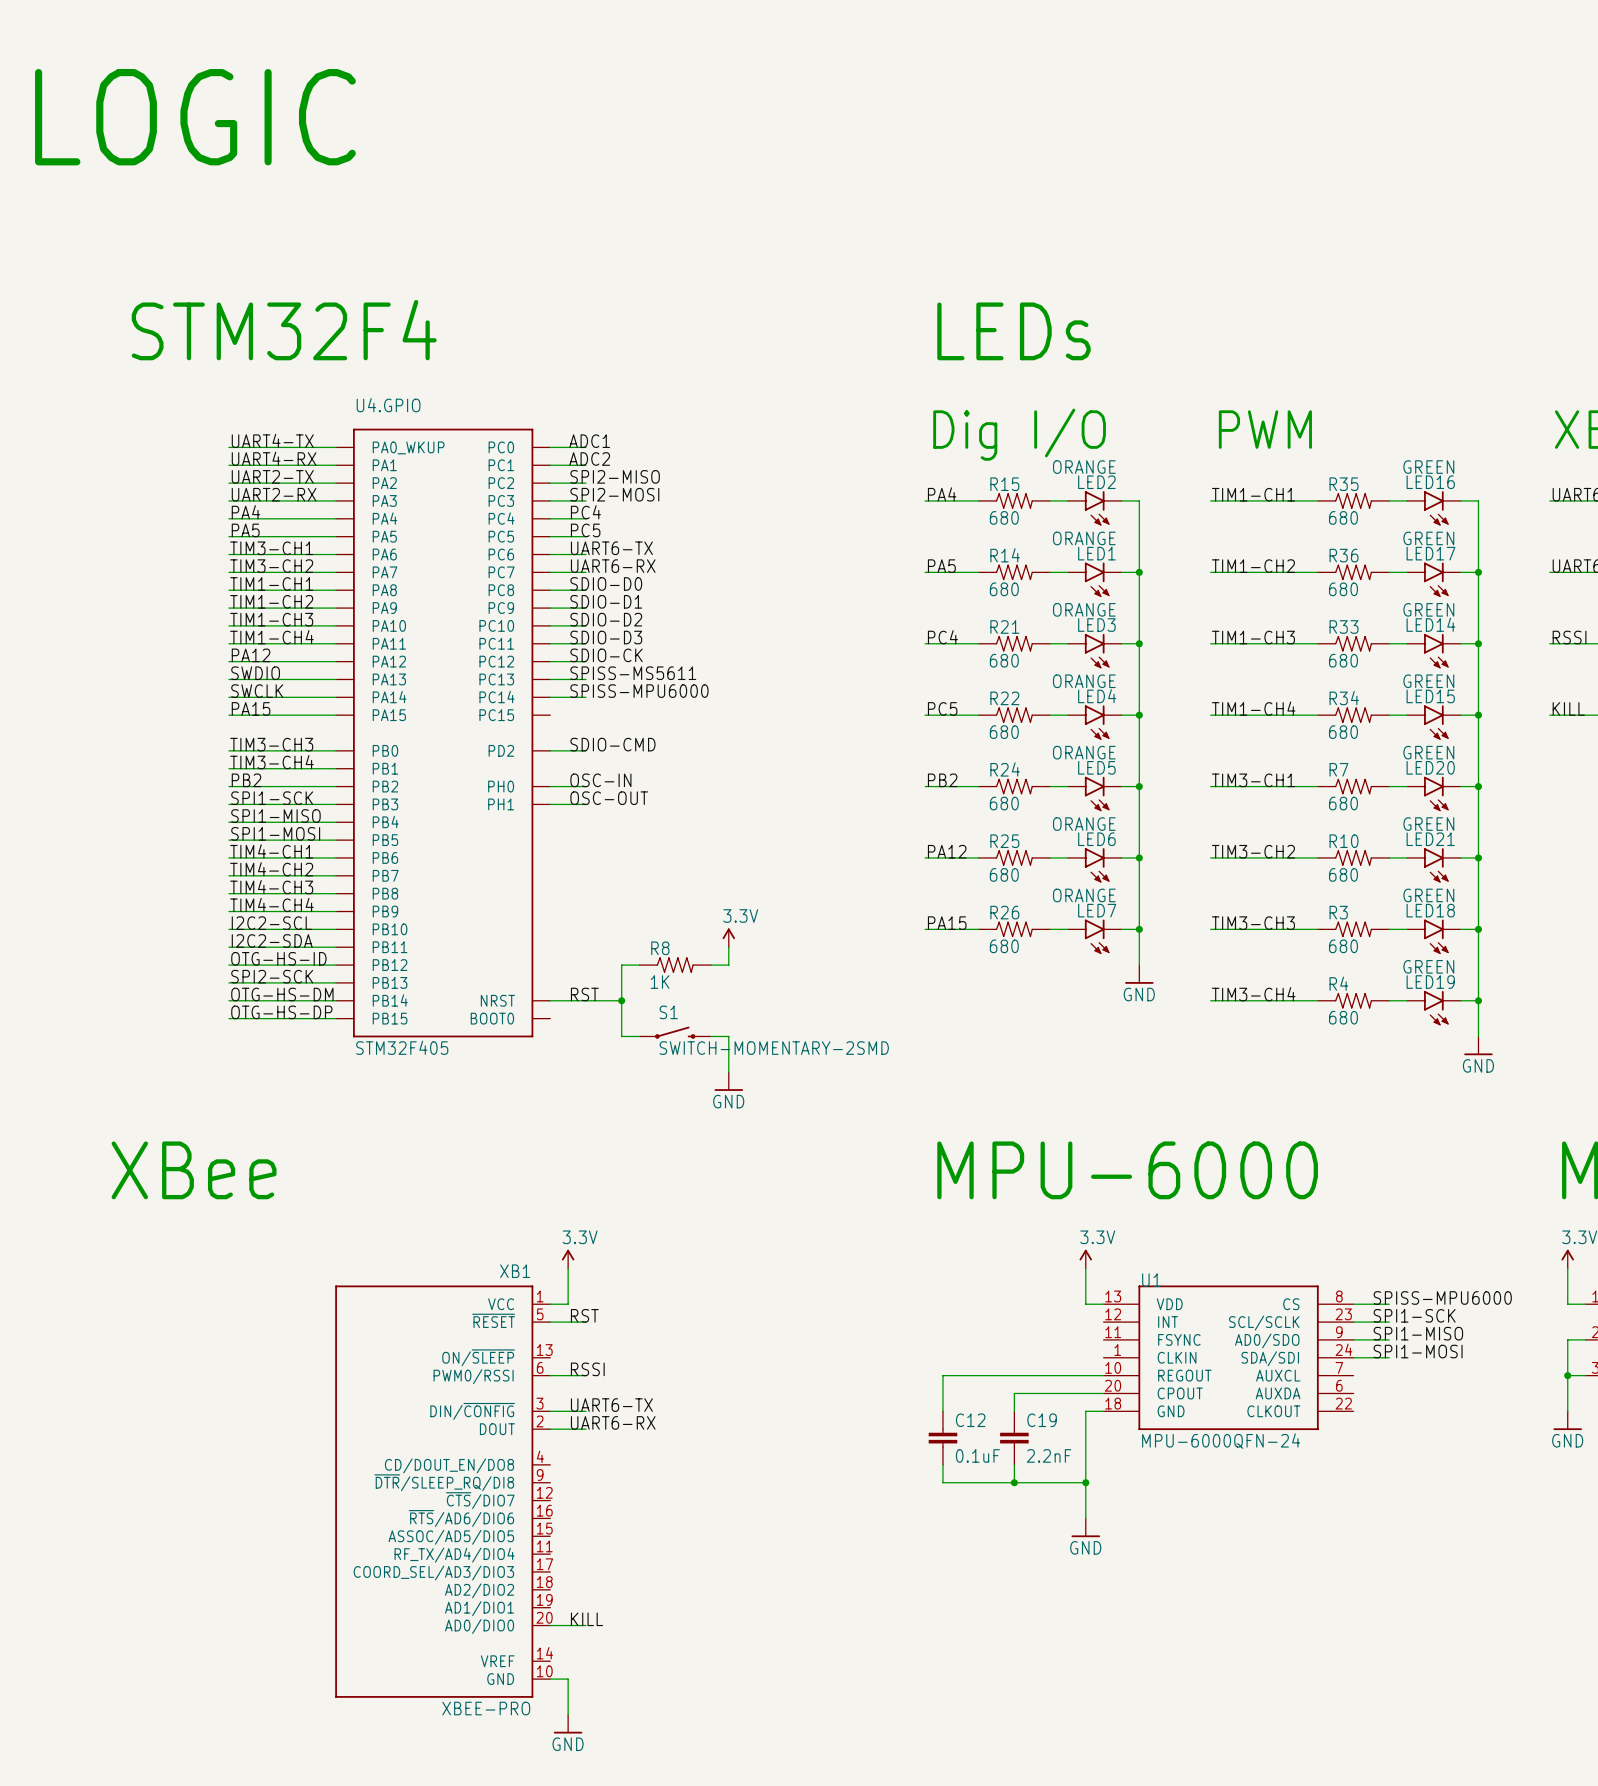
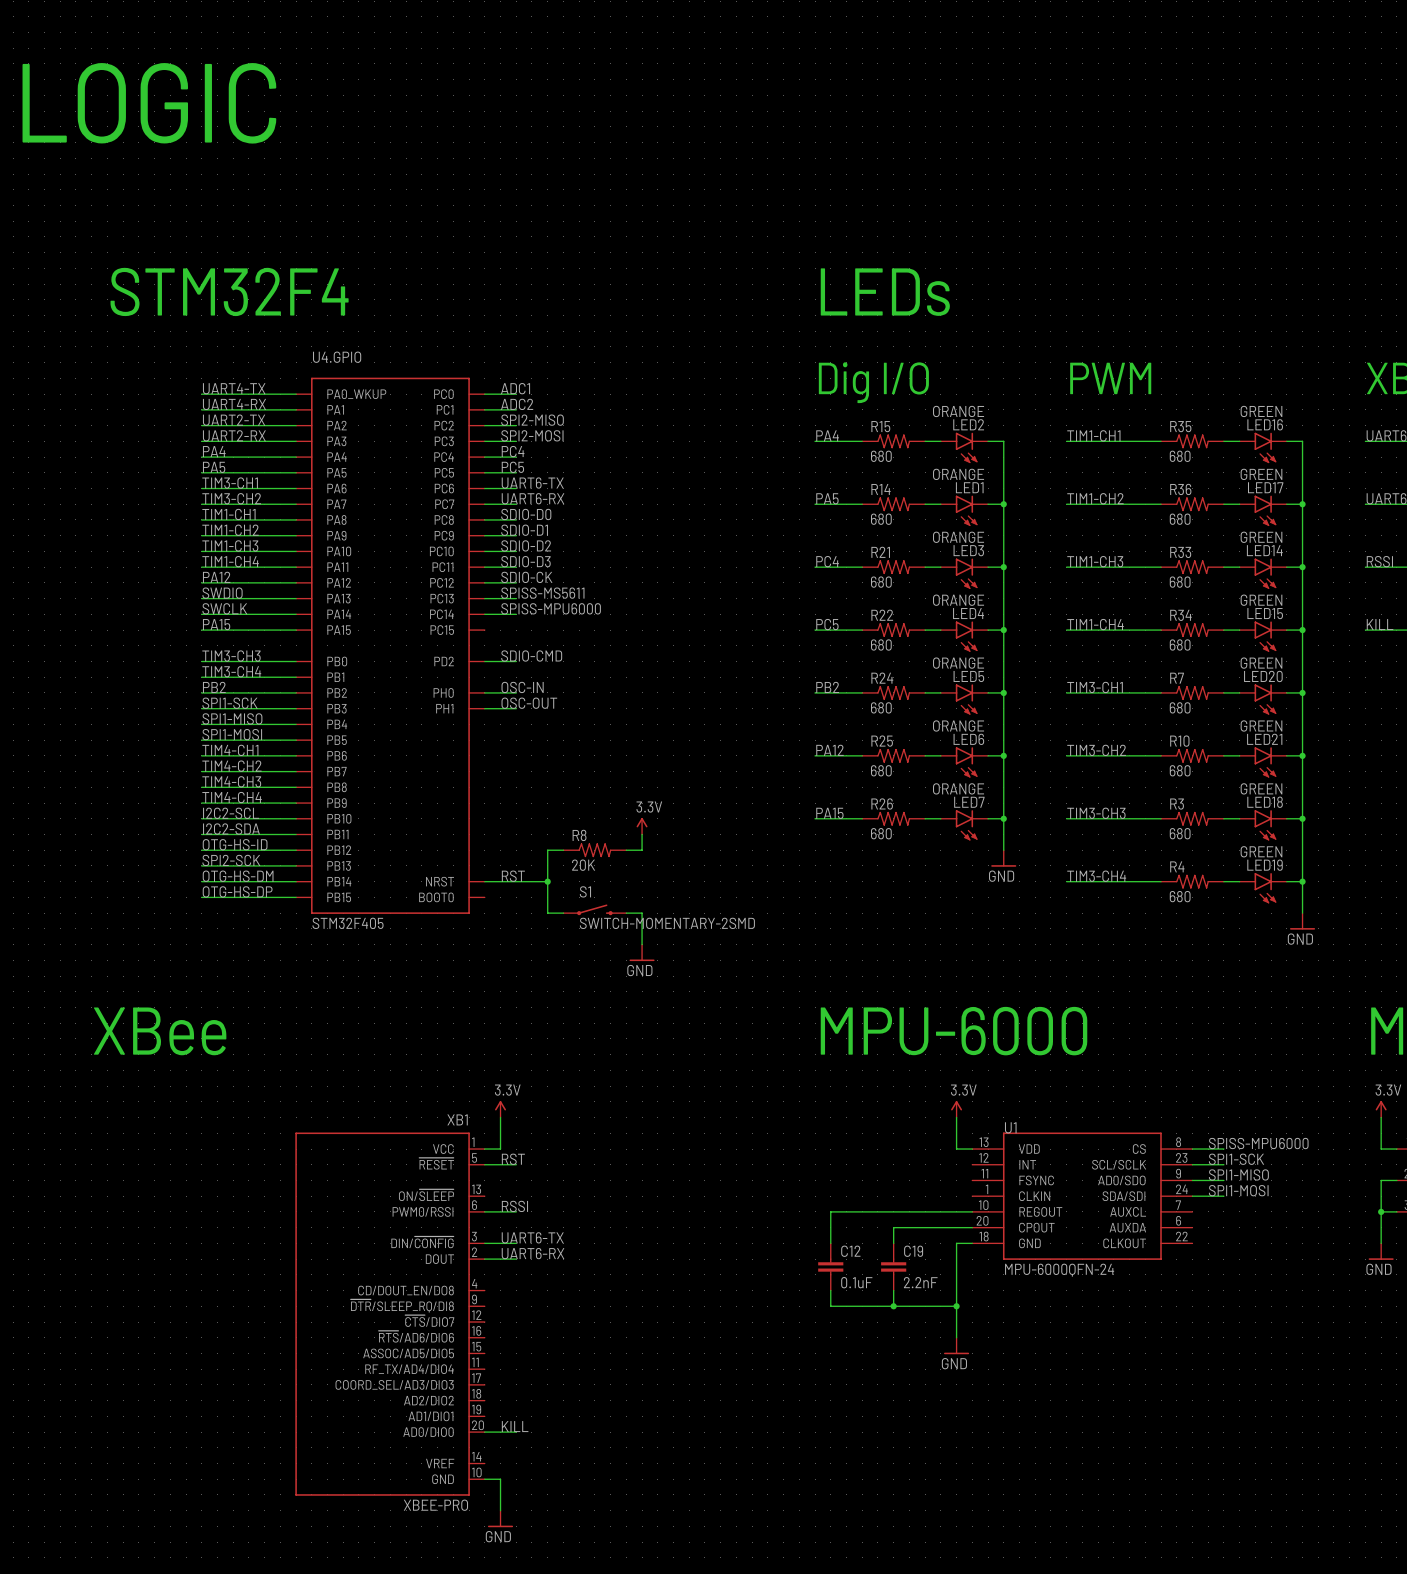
R8 value: 1K (660, 982) -> 20K (583, 865)

